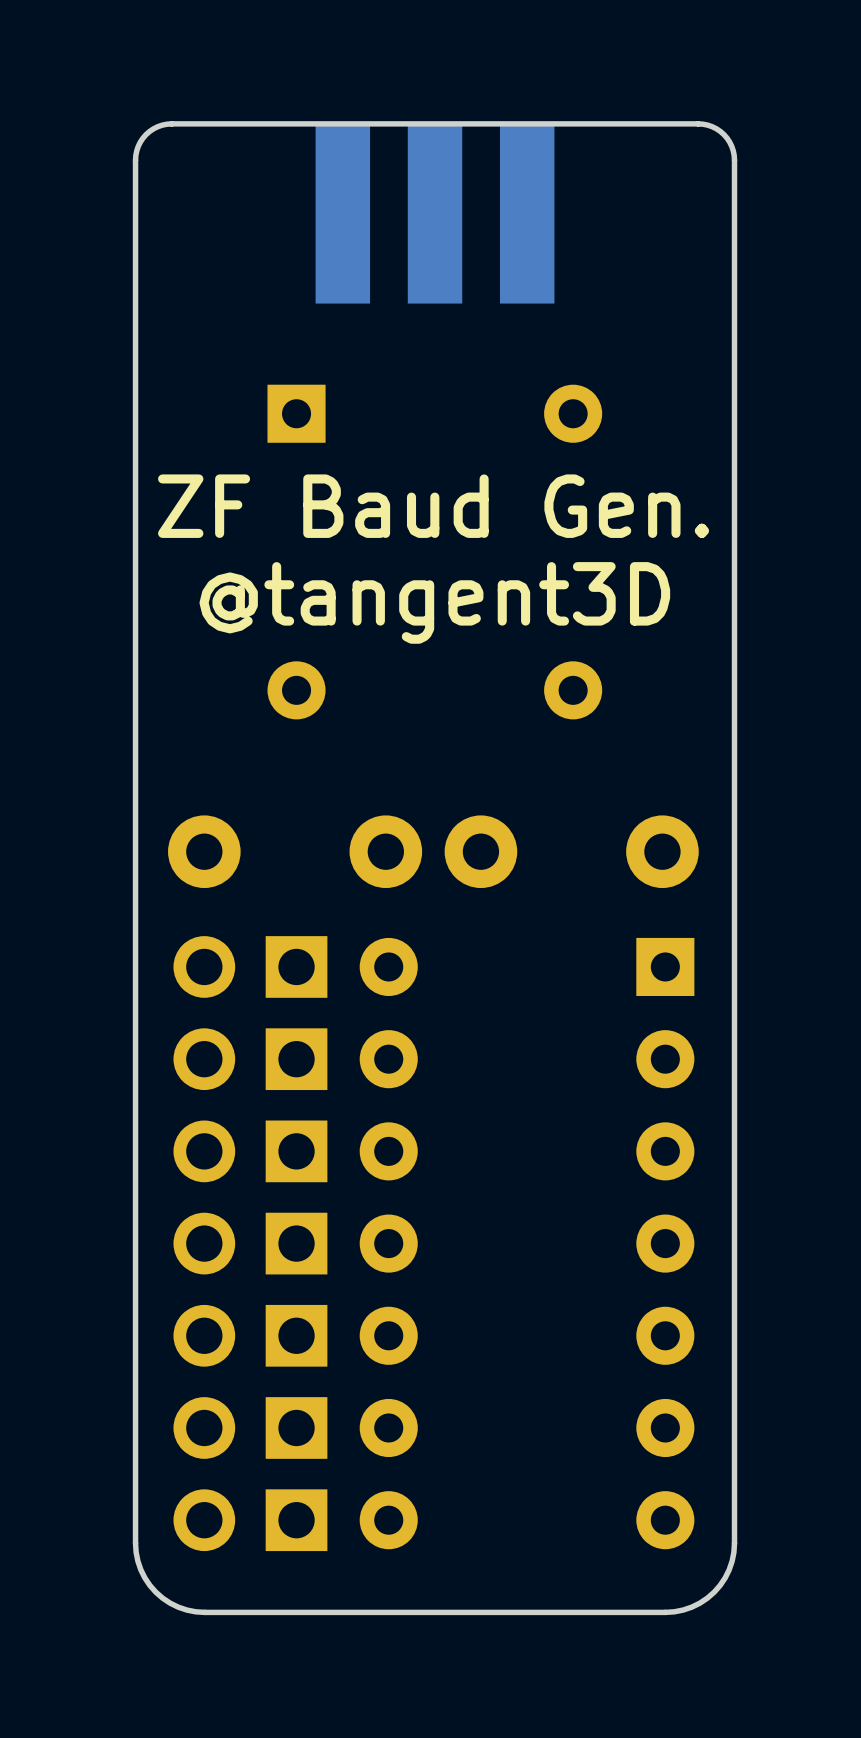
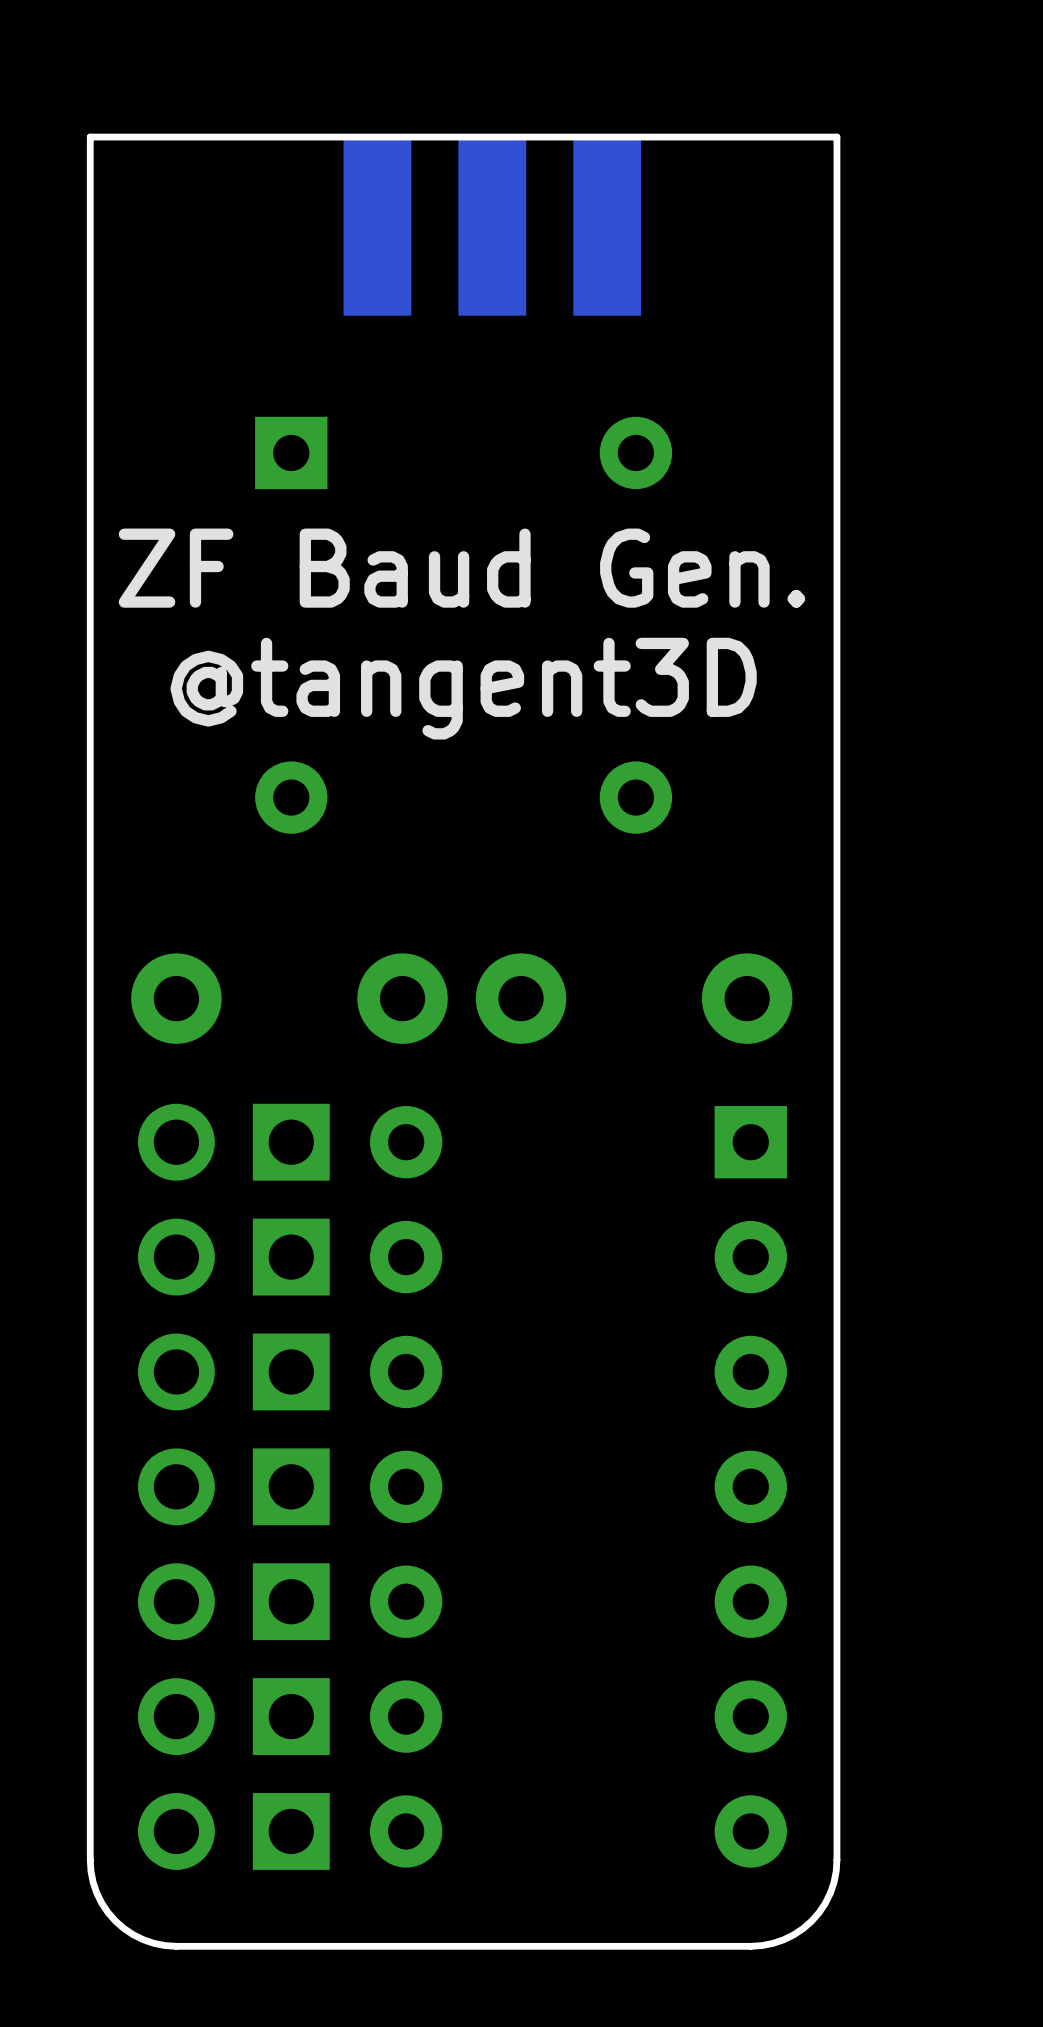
part footprint: [315, 122, 555, 304] -> [343, 134, 642, 316]
board edge: (734, 160) (731, 146) (723, 134) (712, 126) (698, 123) (171, 123) (153, 128) (146, 134) (138, 146) (135, 160) (135, 1543) (140, 1569) (155, 1592) (178, 1607) (204, 1612) -> (836, 137) (90, 137) (90, 1860) (96, 1893) (115, 1921) (143, 1939) (176, 1946)

